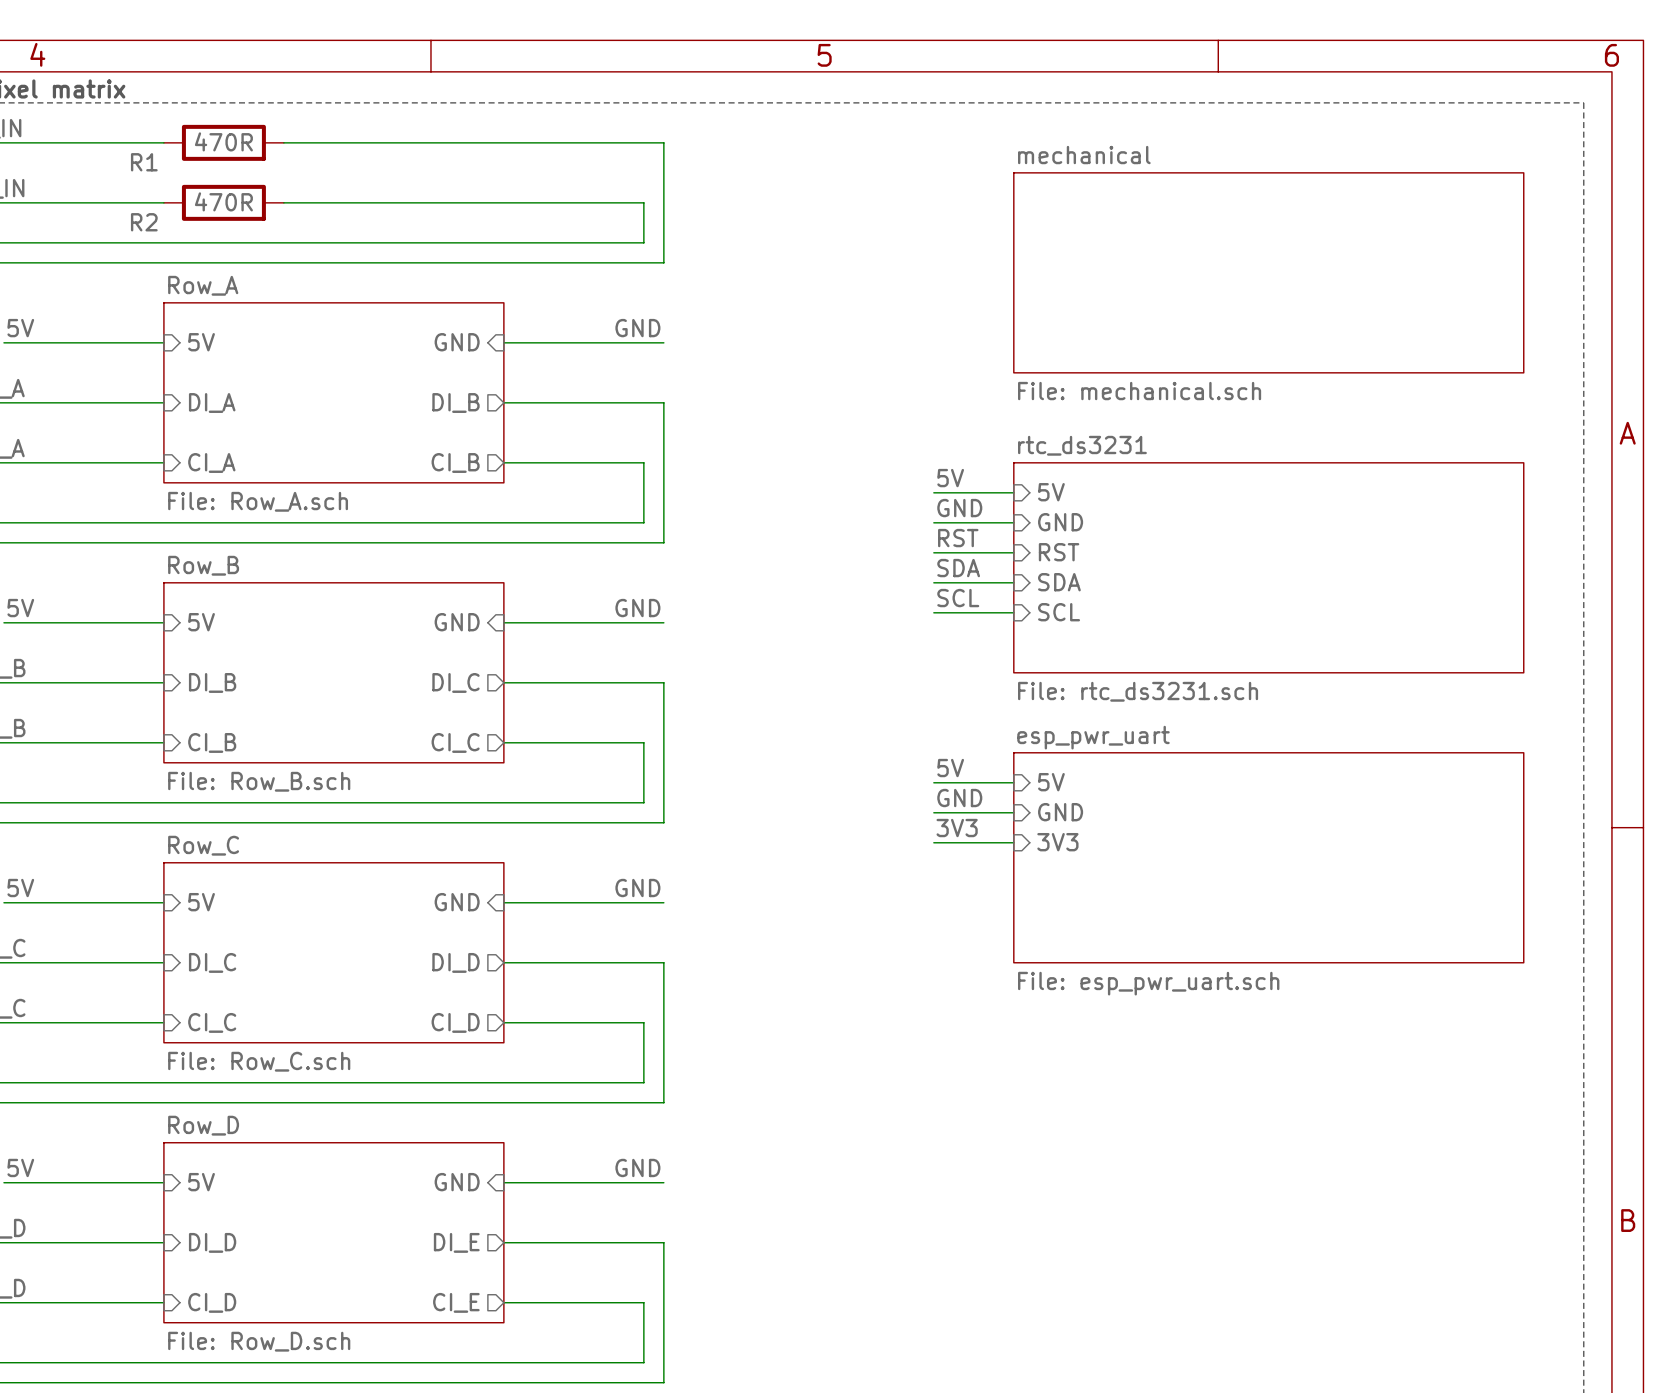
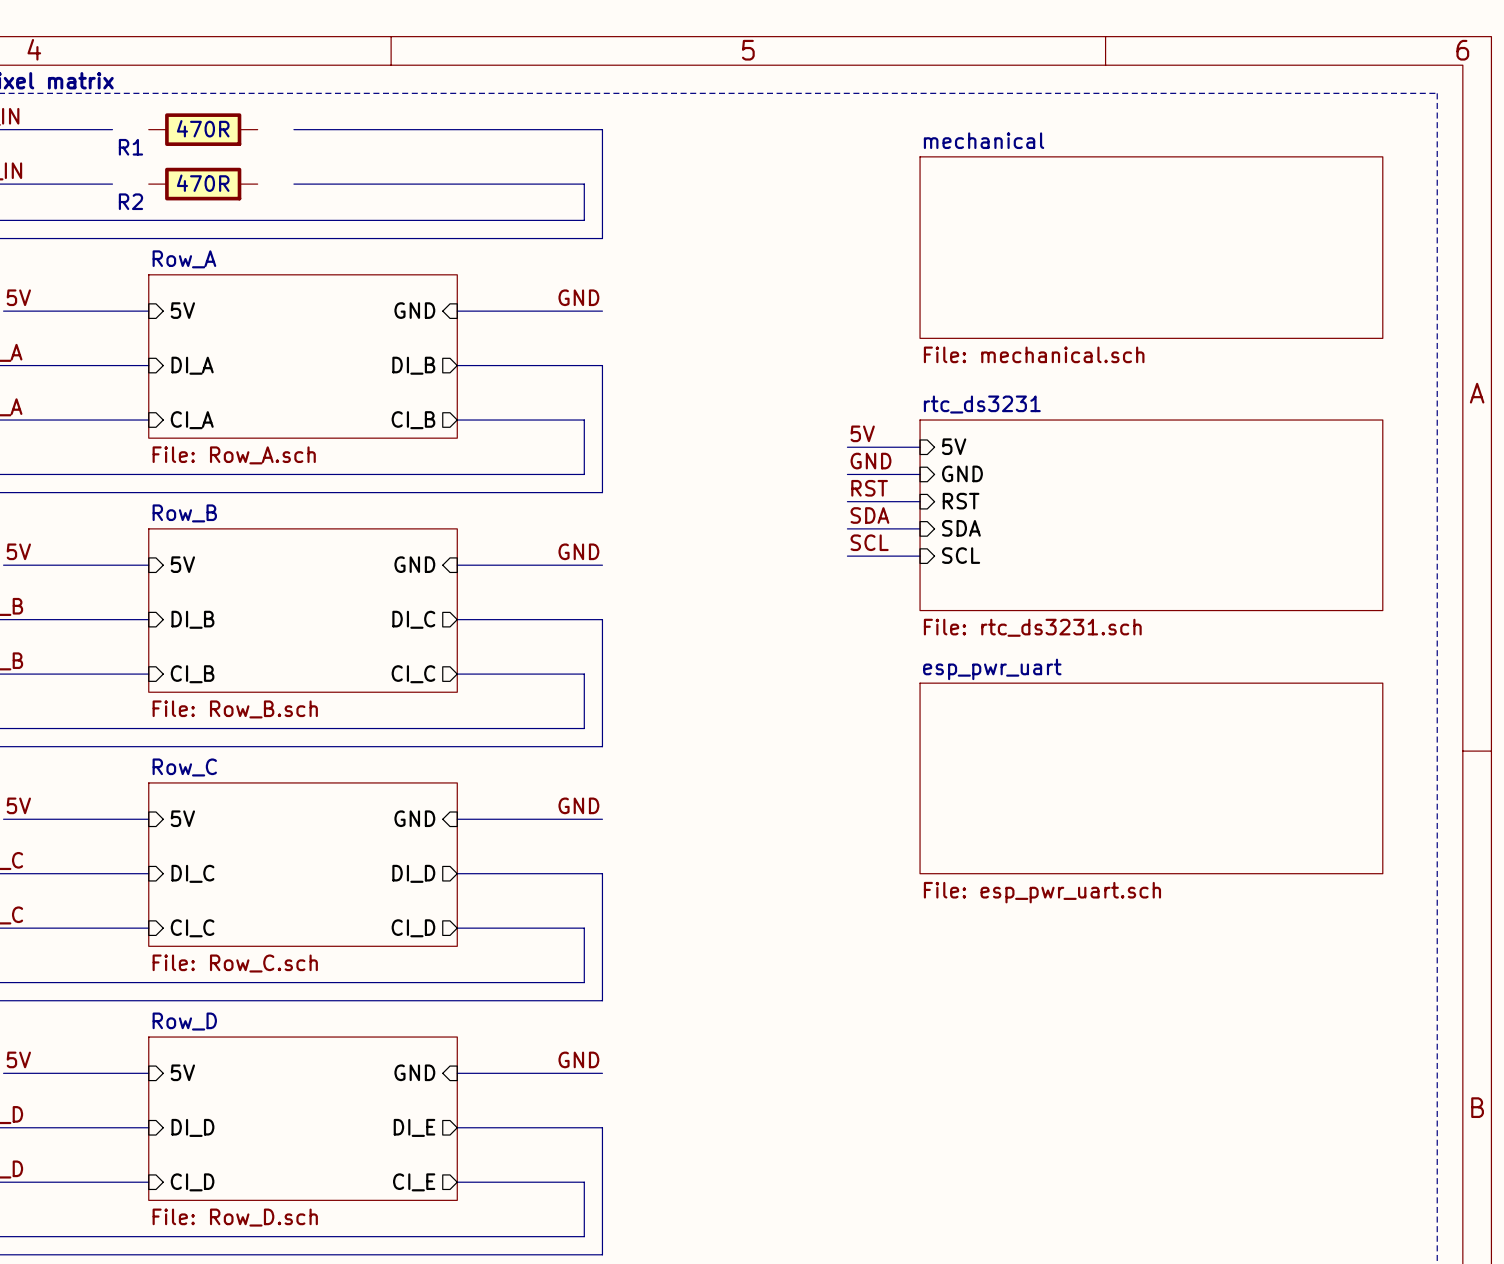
wire: (123, 142) (163, 142) -> none
wire: (283, 142) (323, 142) -> none
wire: (123, 202) (163, 202) -> none
wire: (283, 202) (323, 202) -> none
label: 5V (950, 768) -> none
wire: (933, 782) (1013, 782) -> none
sheet pin: 5V (1051, 782) -> none
label: GND (959, 798) -> none
wire: (933, 812) (1013, 812) -> none
sheet pin: GND (1060, 812) -> none
label: 3V3 (957, 828) -> none
wire: (933, 842) (1013, 842) -> none
sheet pin: 3V3 (1057, 842) -> none

